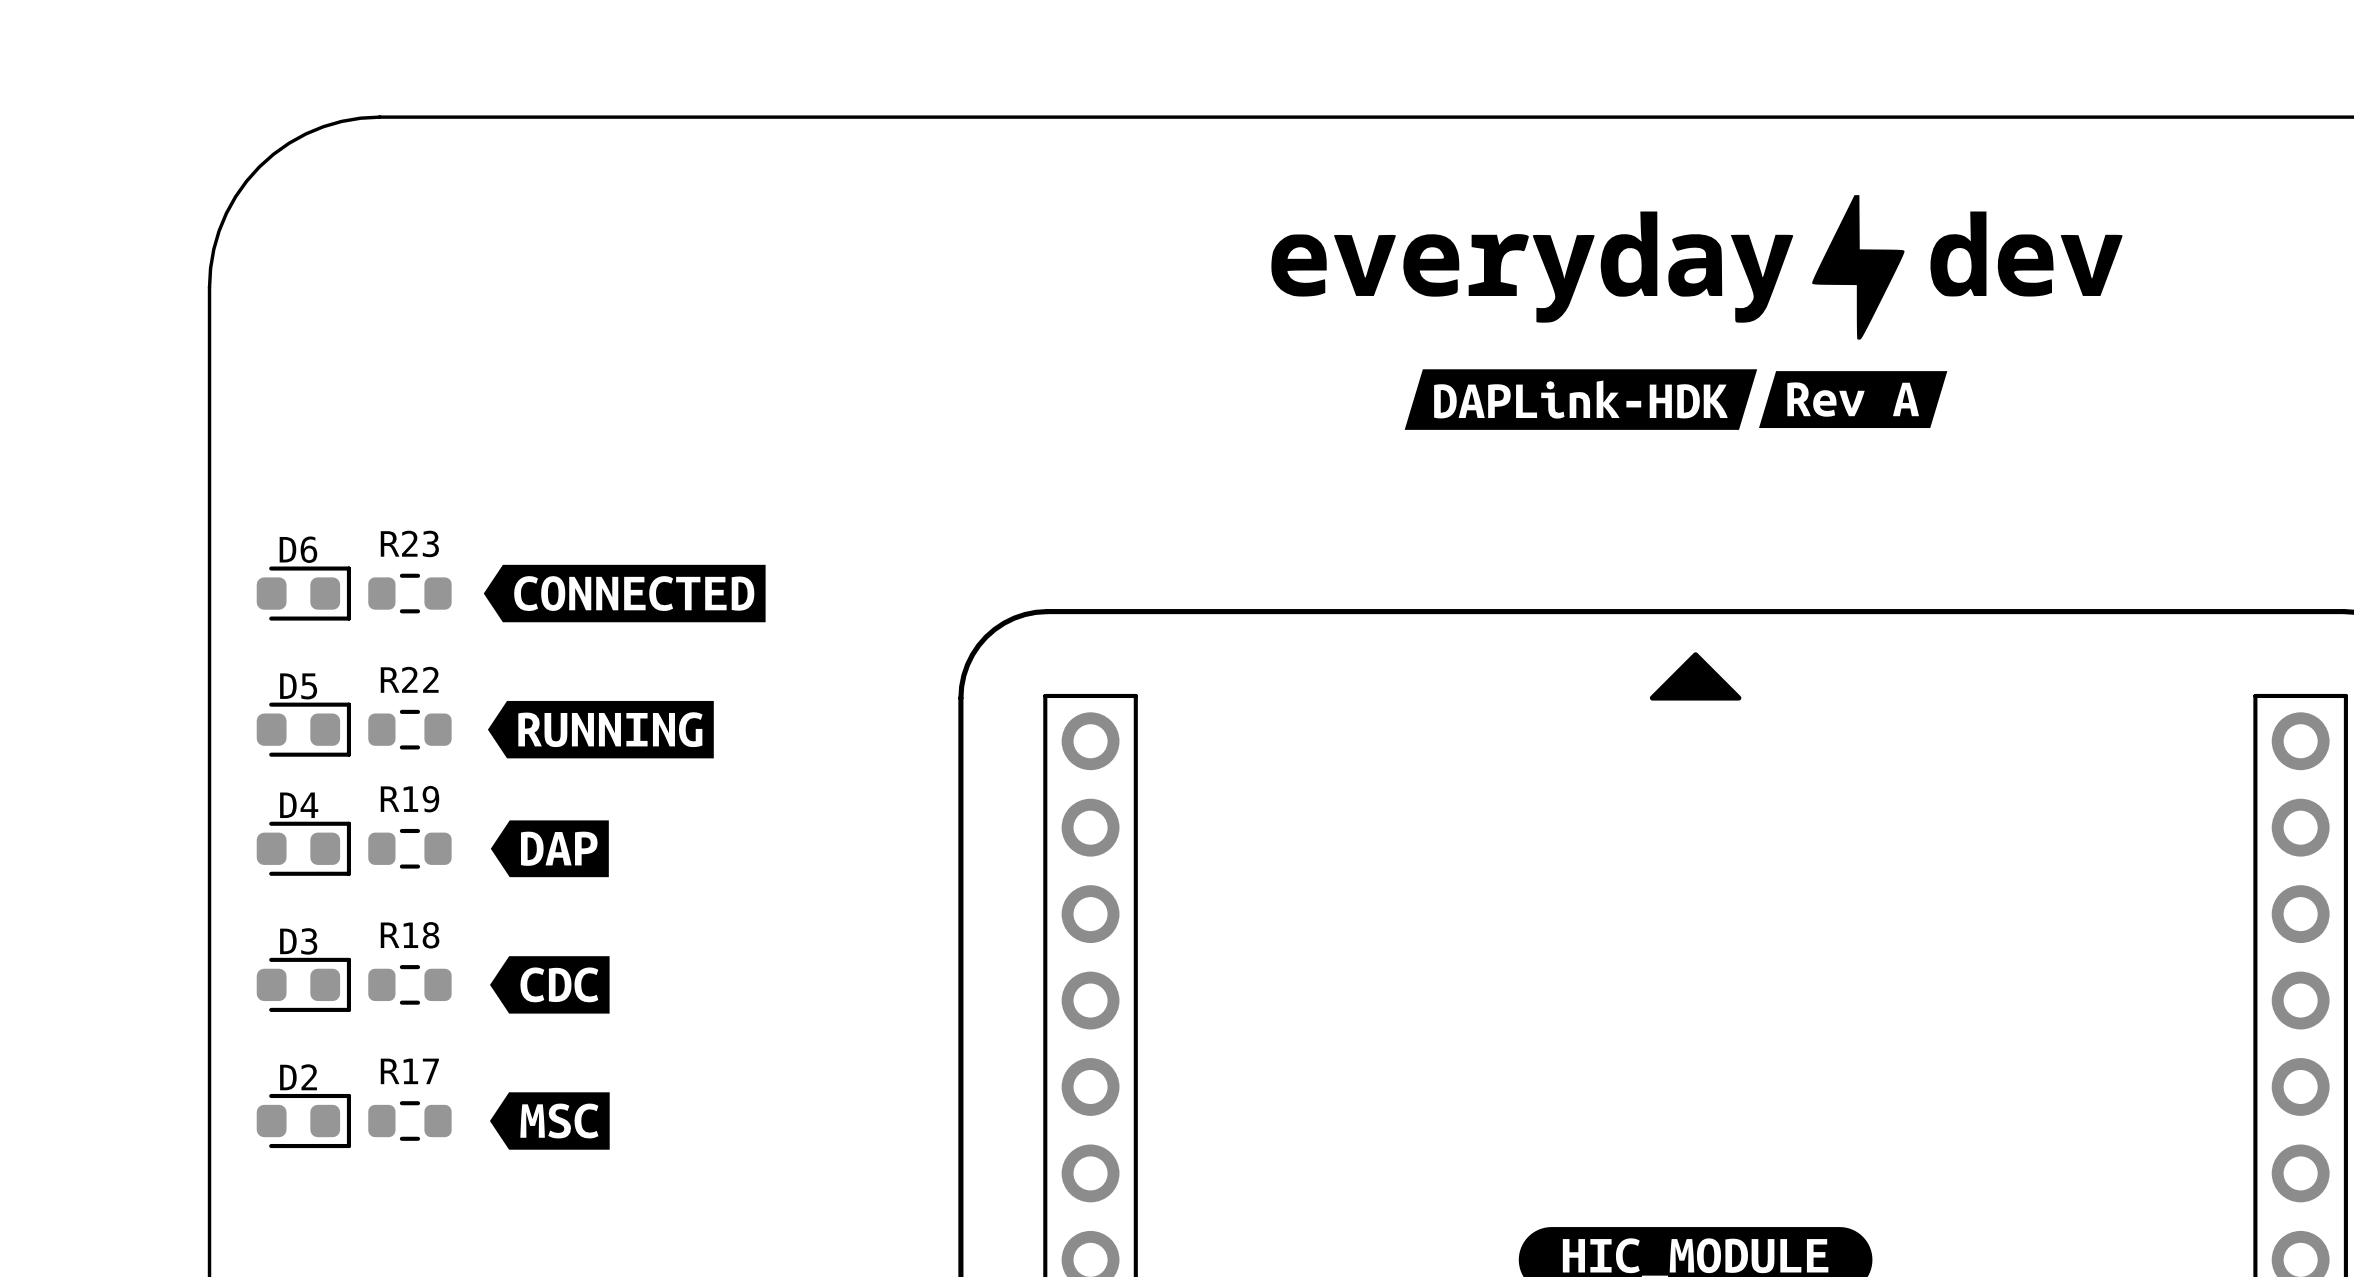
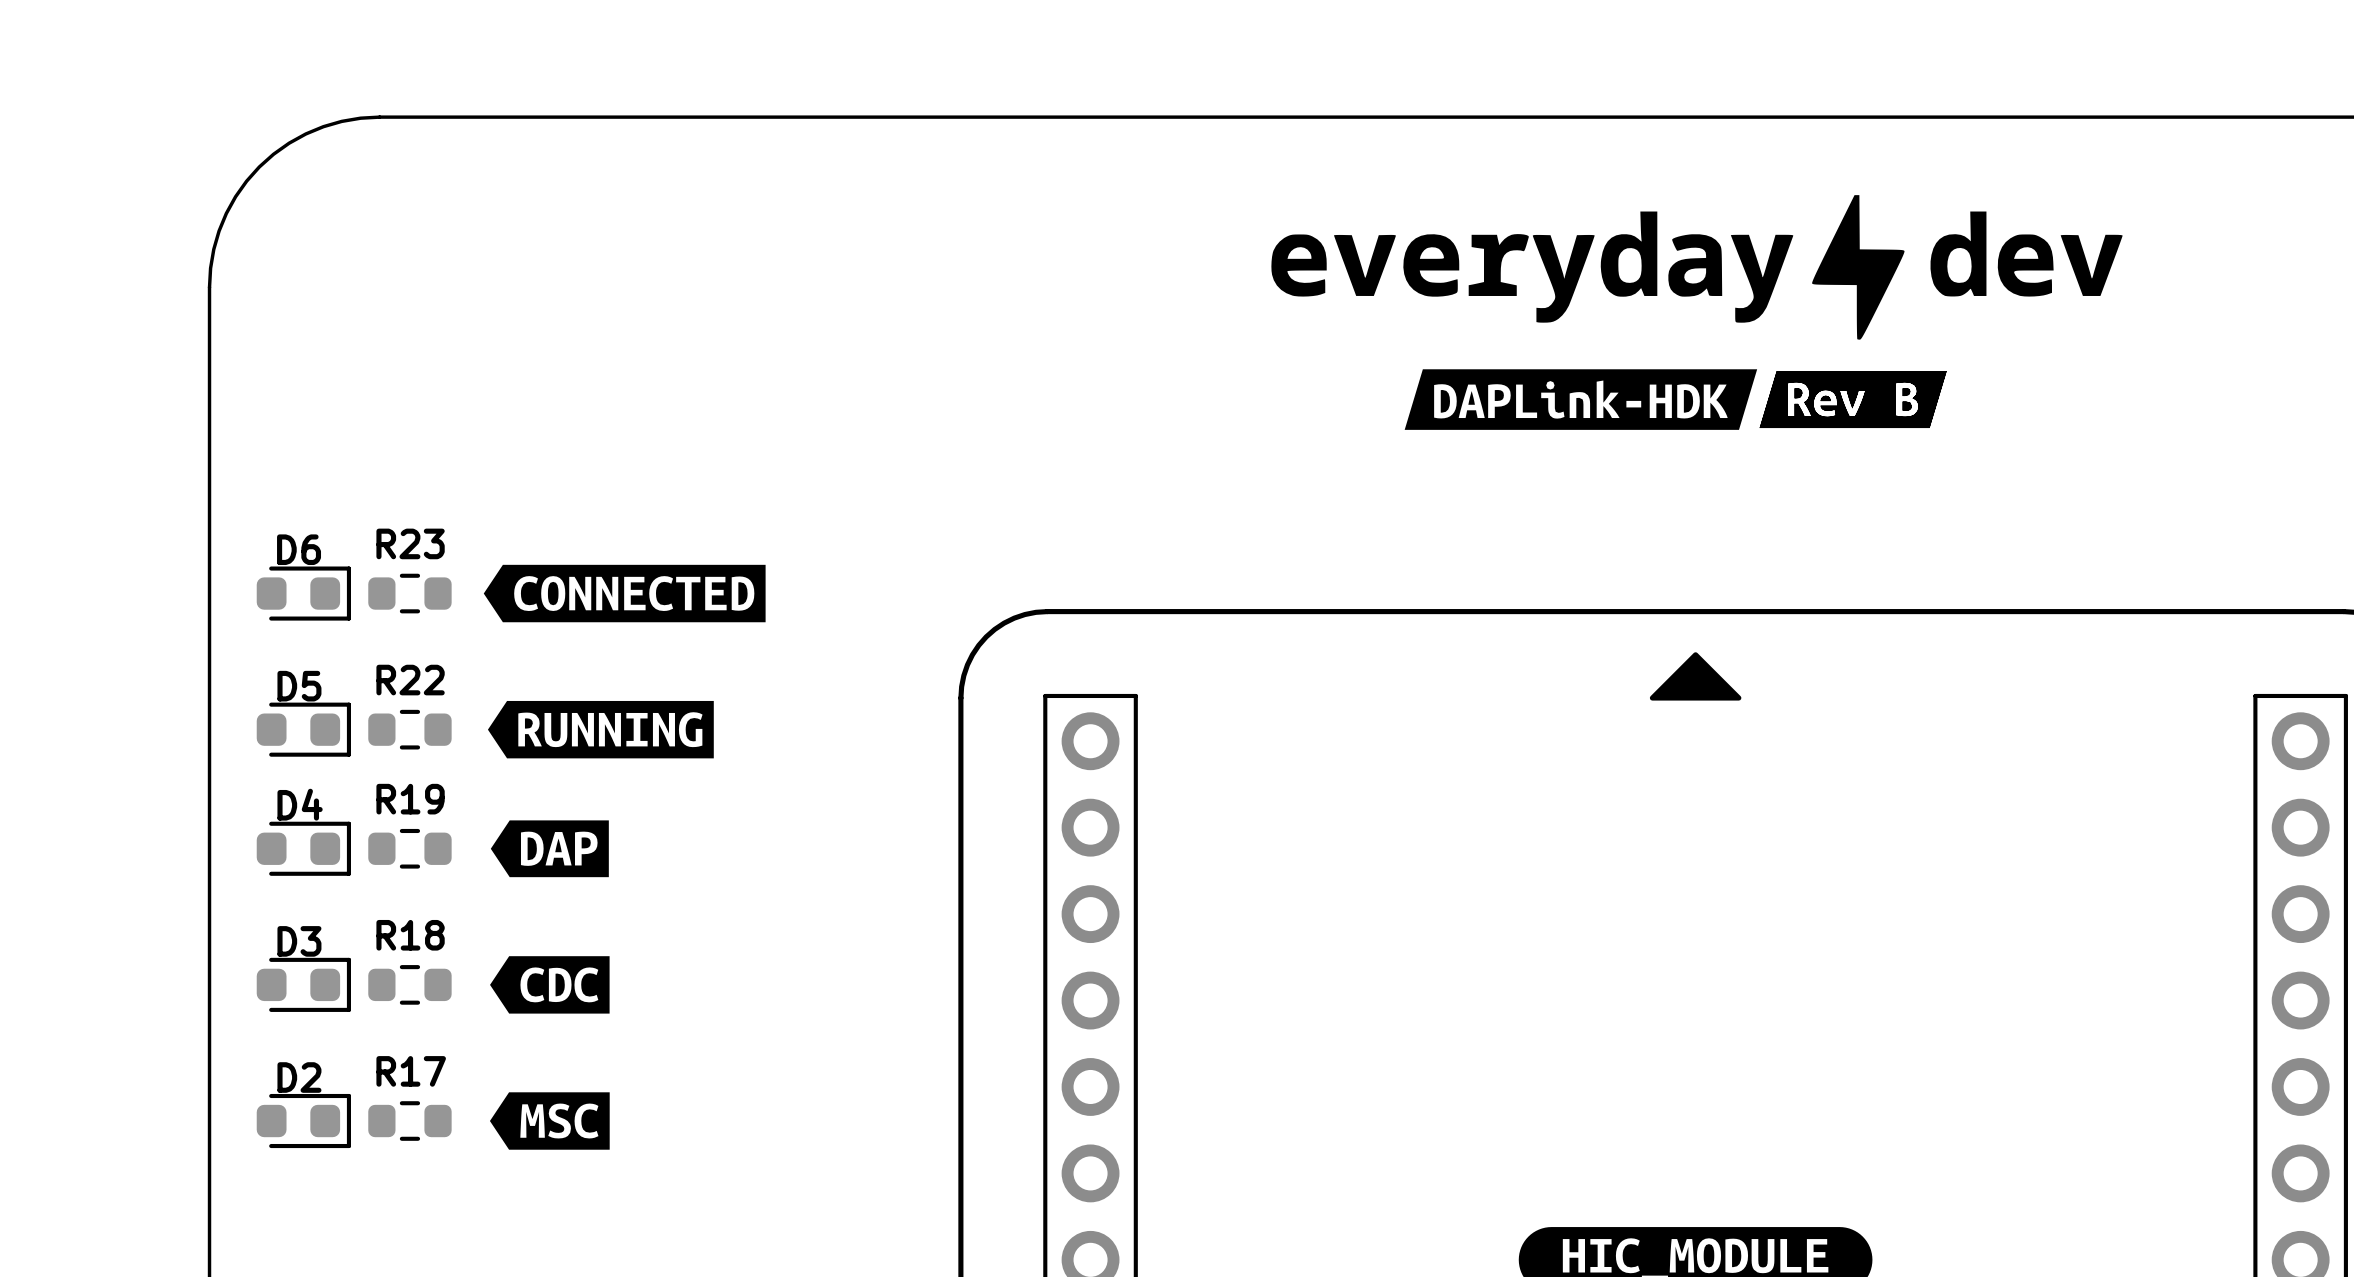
drawing shape: [1759, 371, 1948, 429] -> [1759, 371, 1947, 429]

